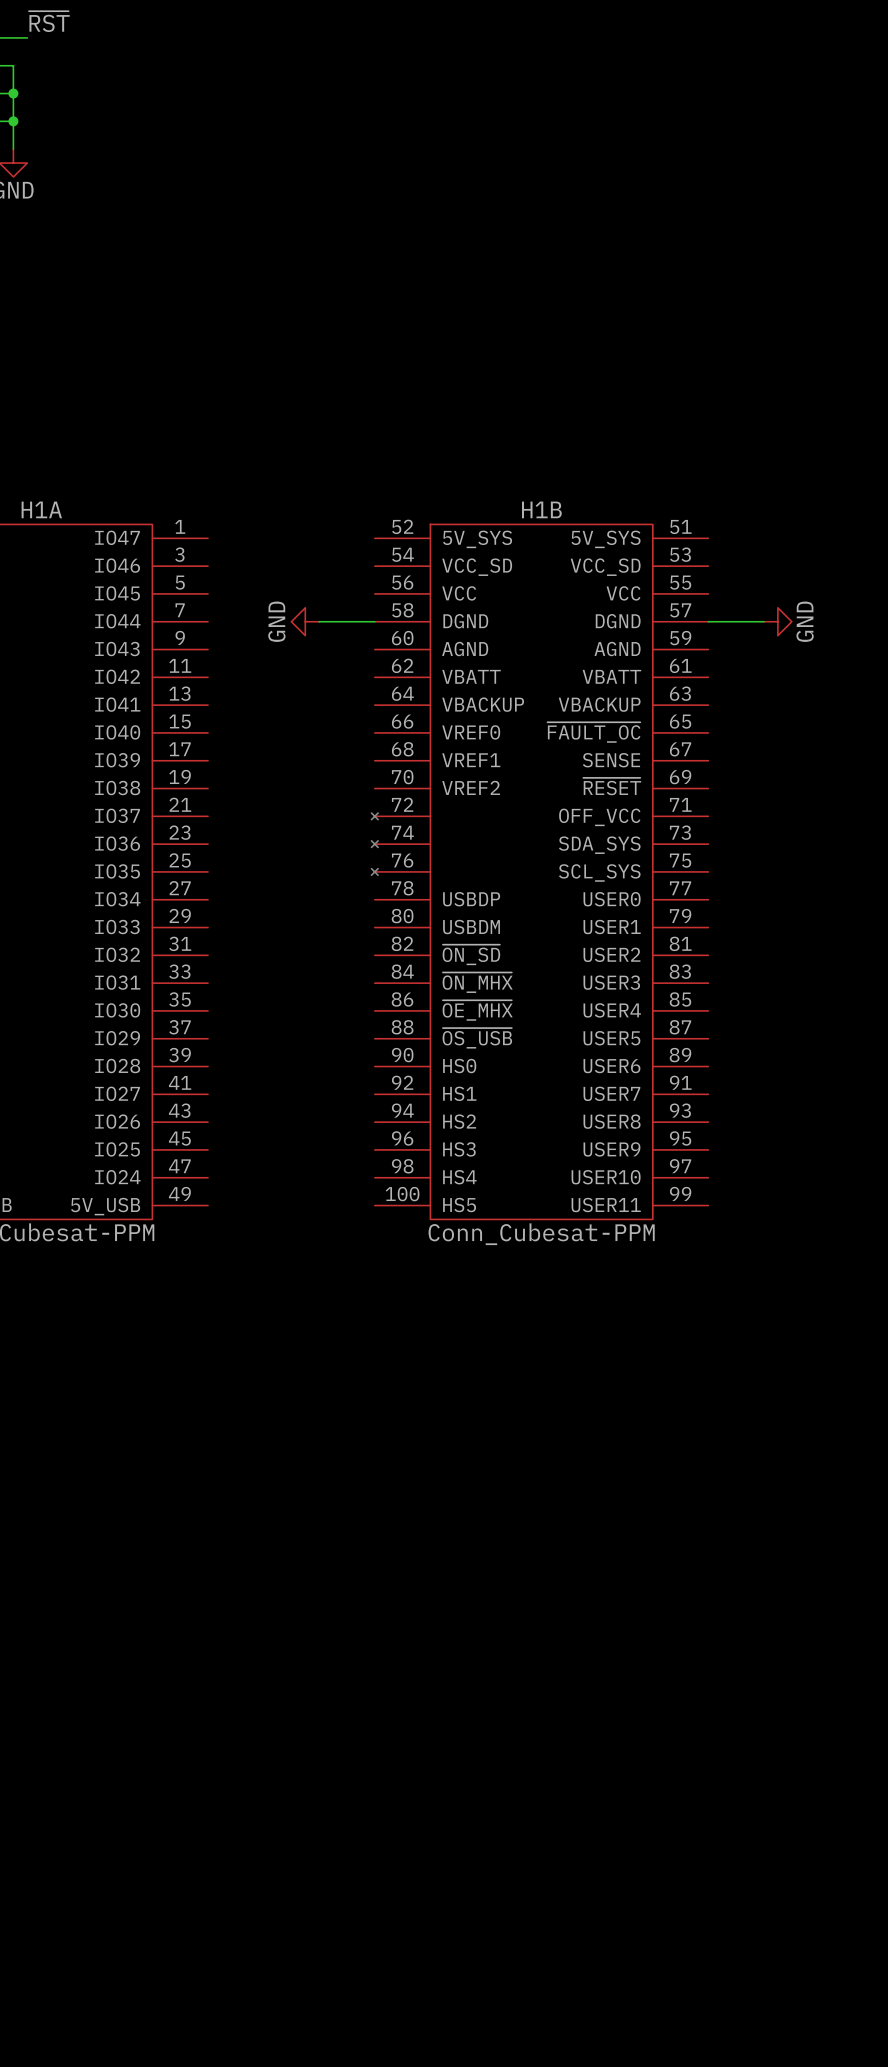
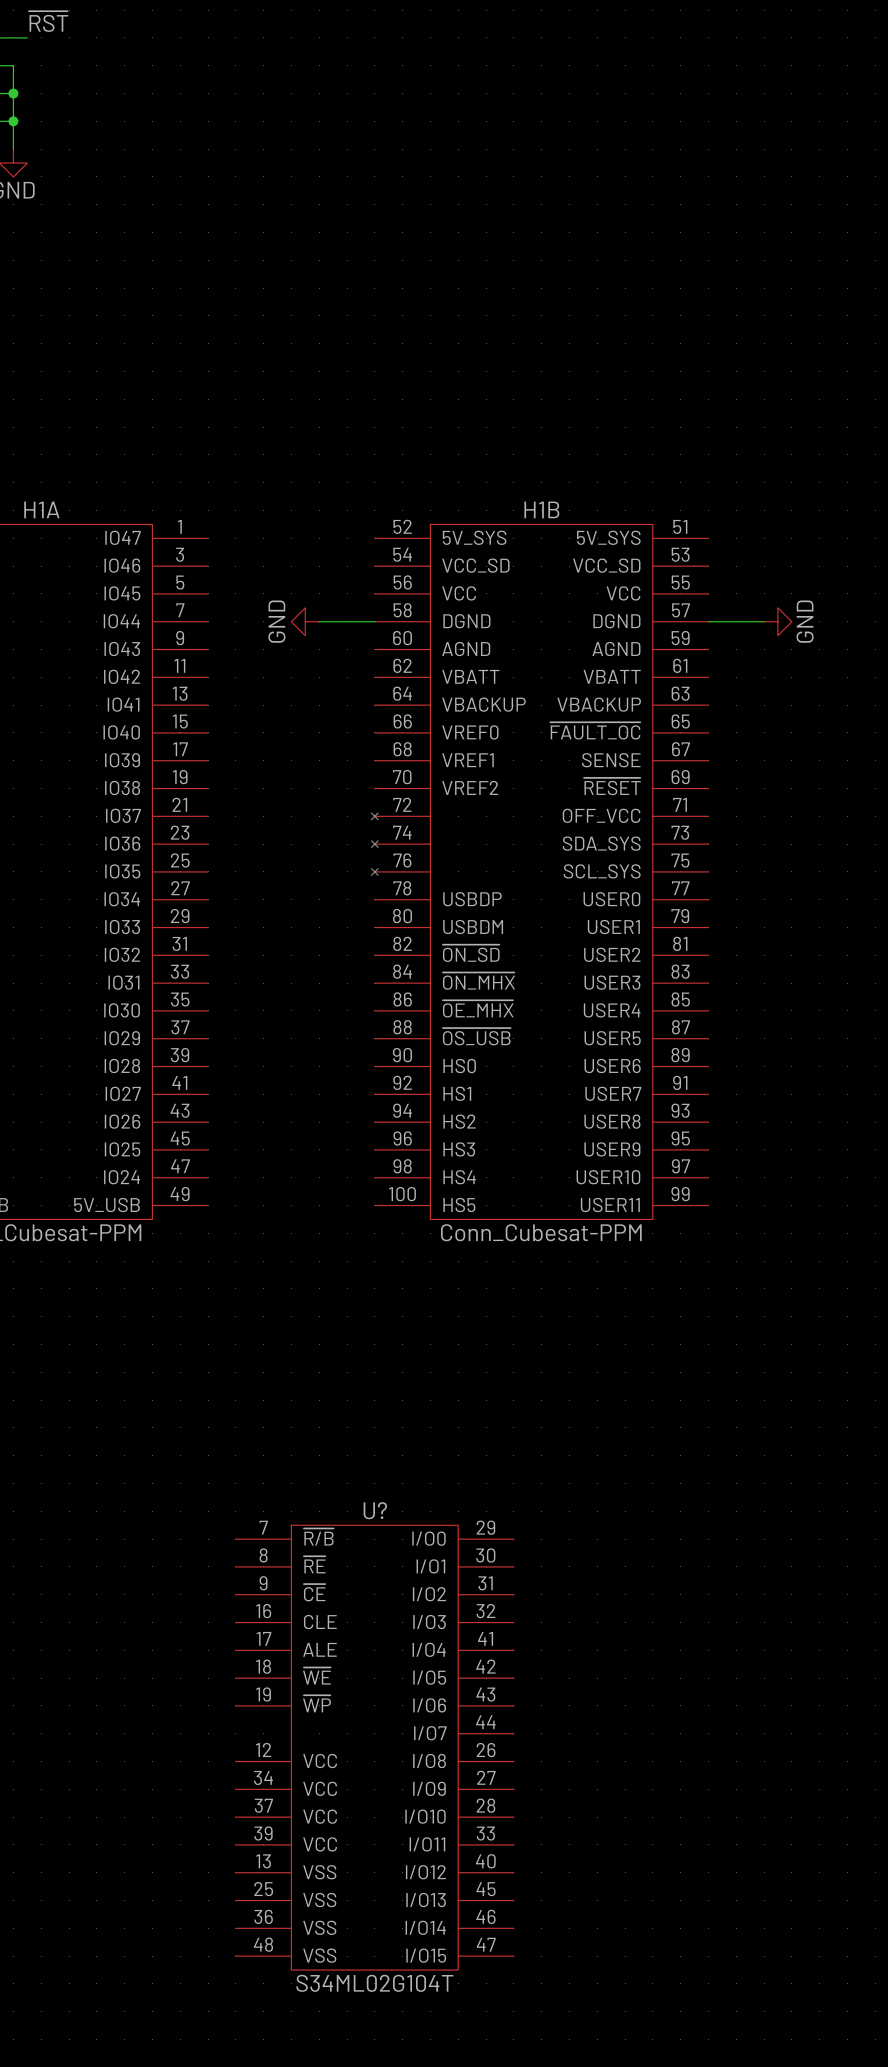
U?: none -> S34ML02G104T (374, 1747)

